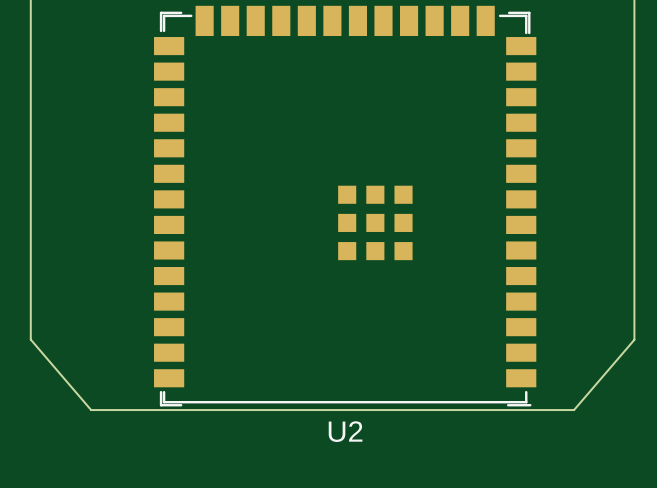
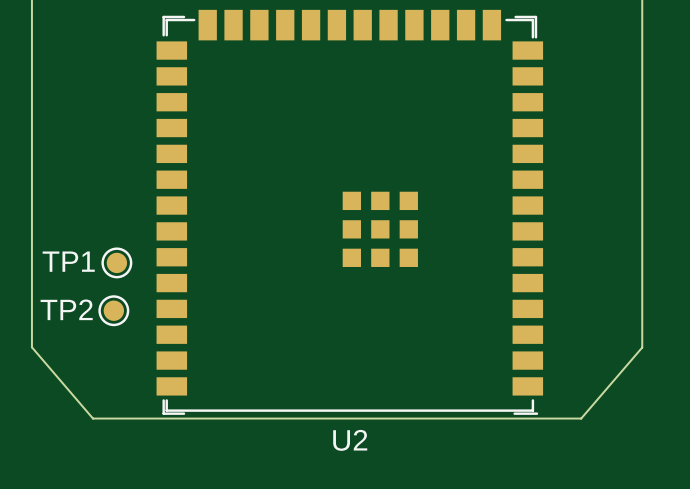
TP1: none -> (116, 262)
TP2: none -> (113, 310)

